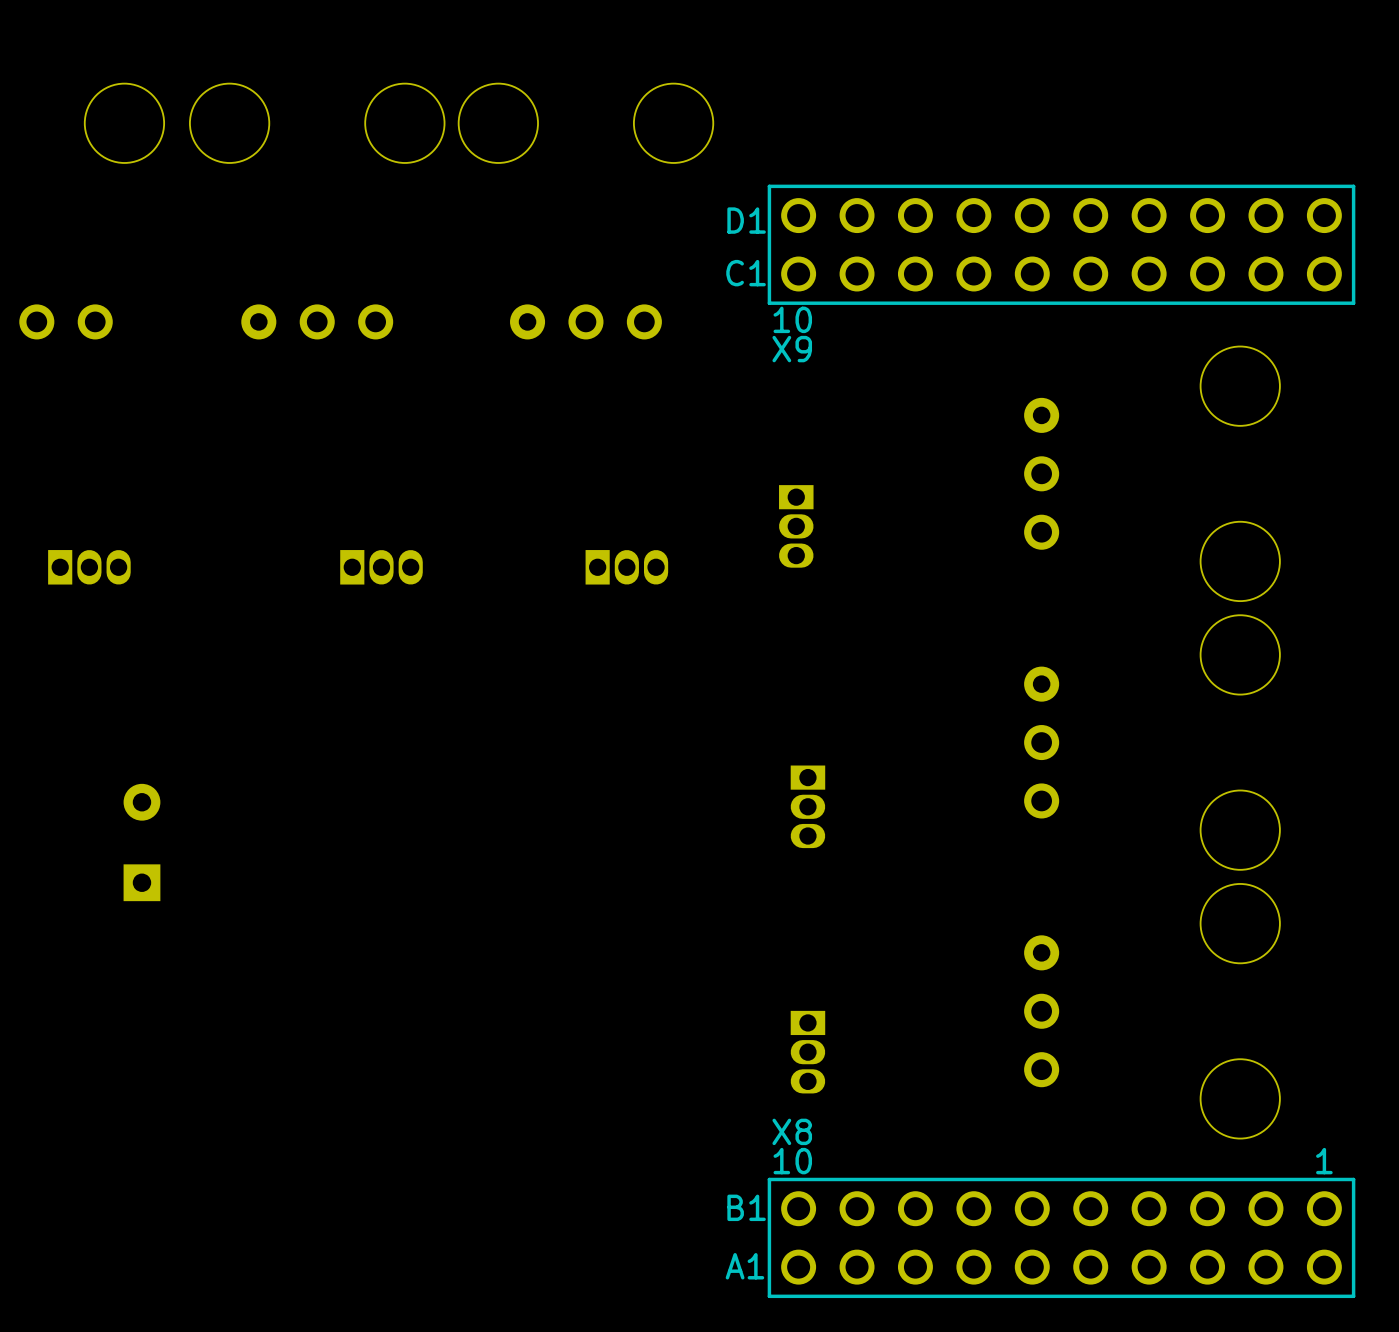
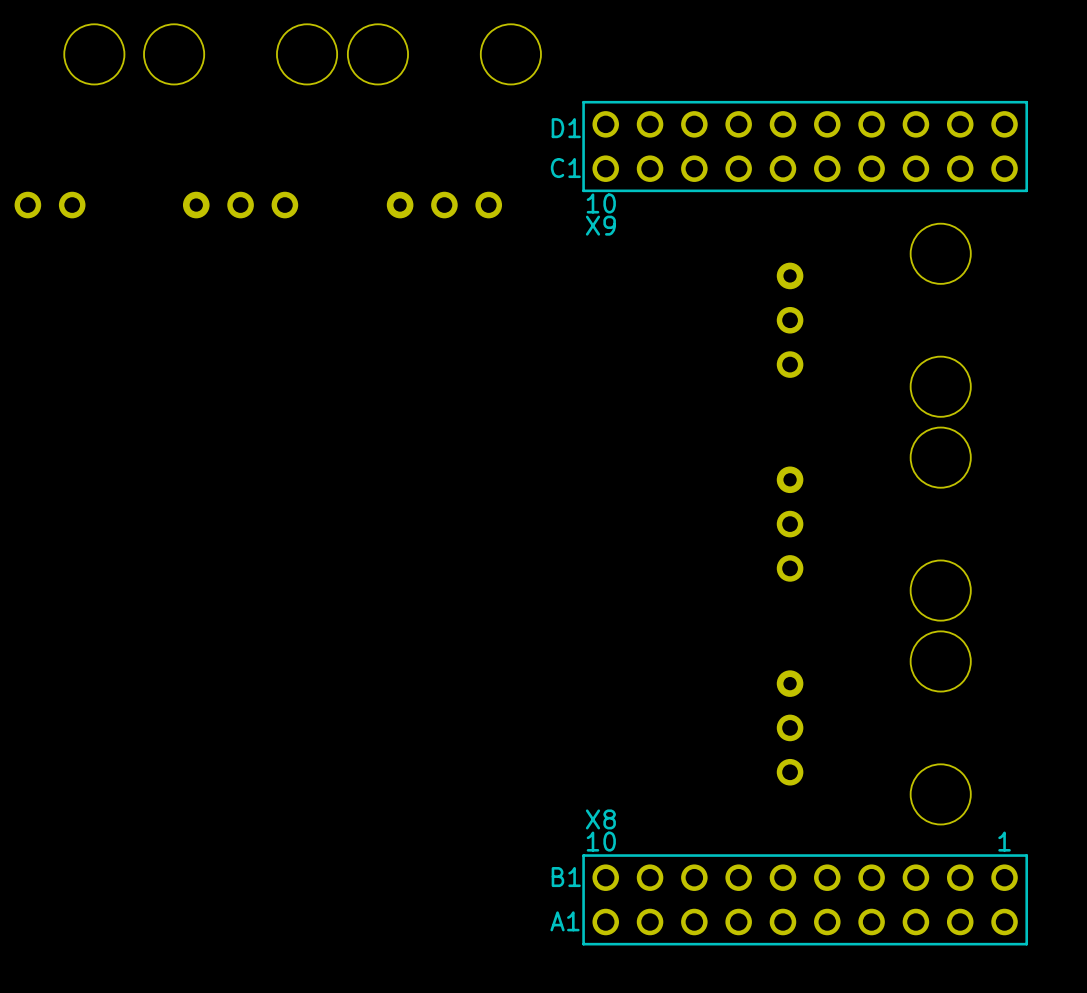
part: (796, 526) -> none
part: (89, 567) -> none
part: (381, 567) -> none
part: (626, 567) -> none
part: (807, 806) -> none
part: (141, 842) -> none
part: (807, 1052) -> none

